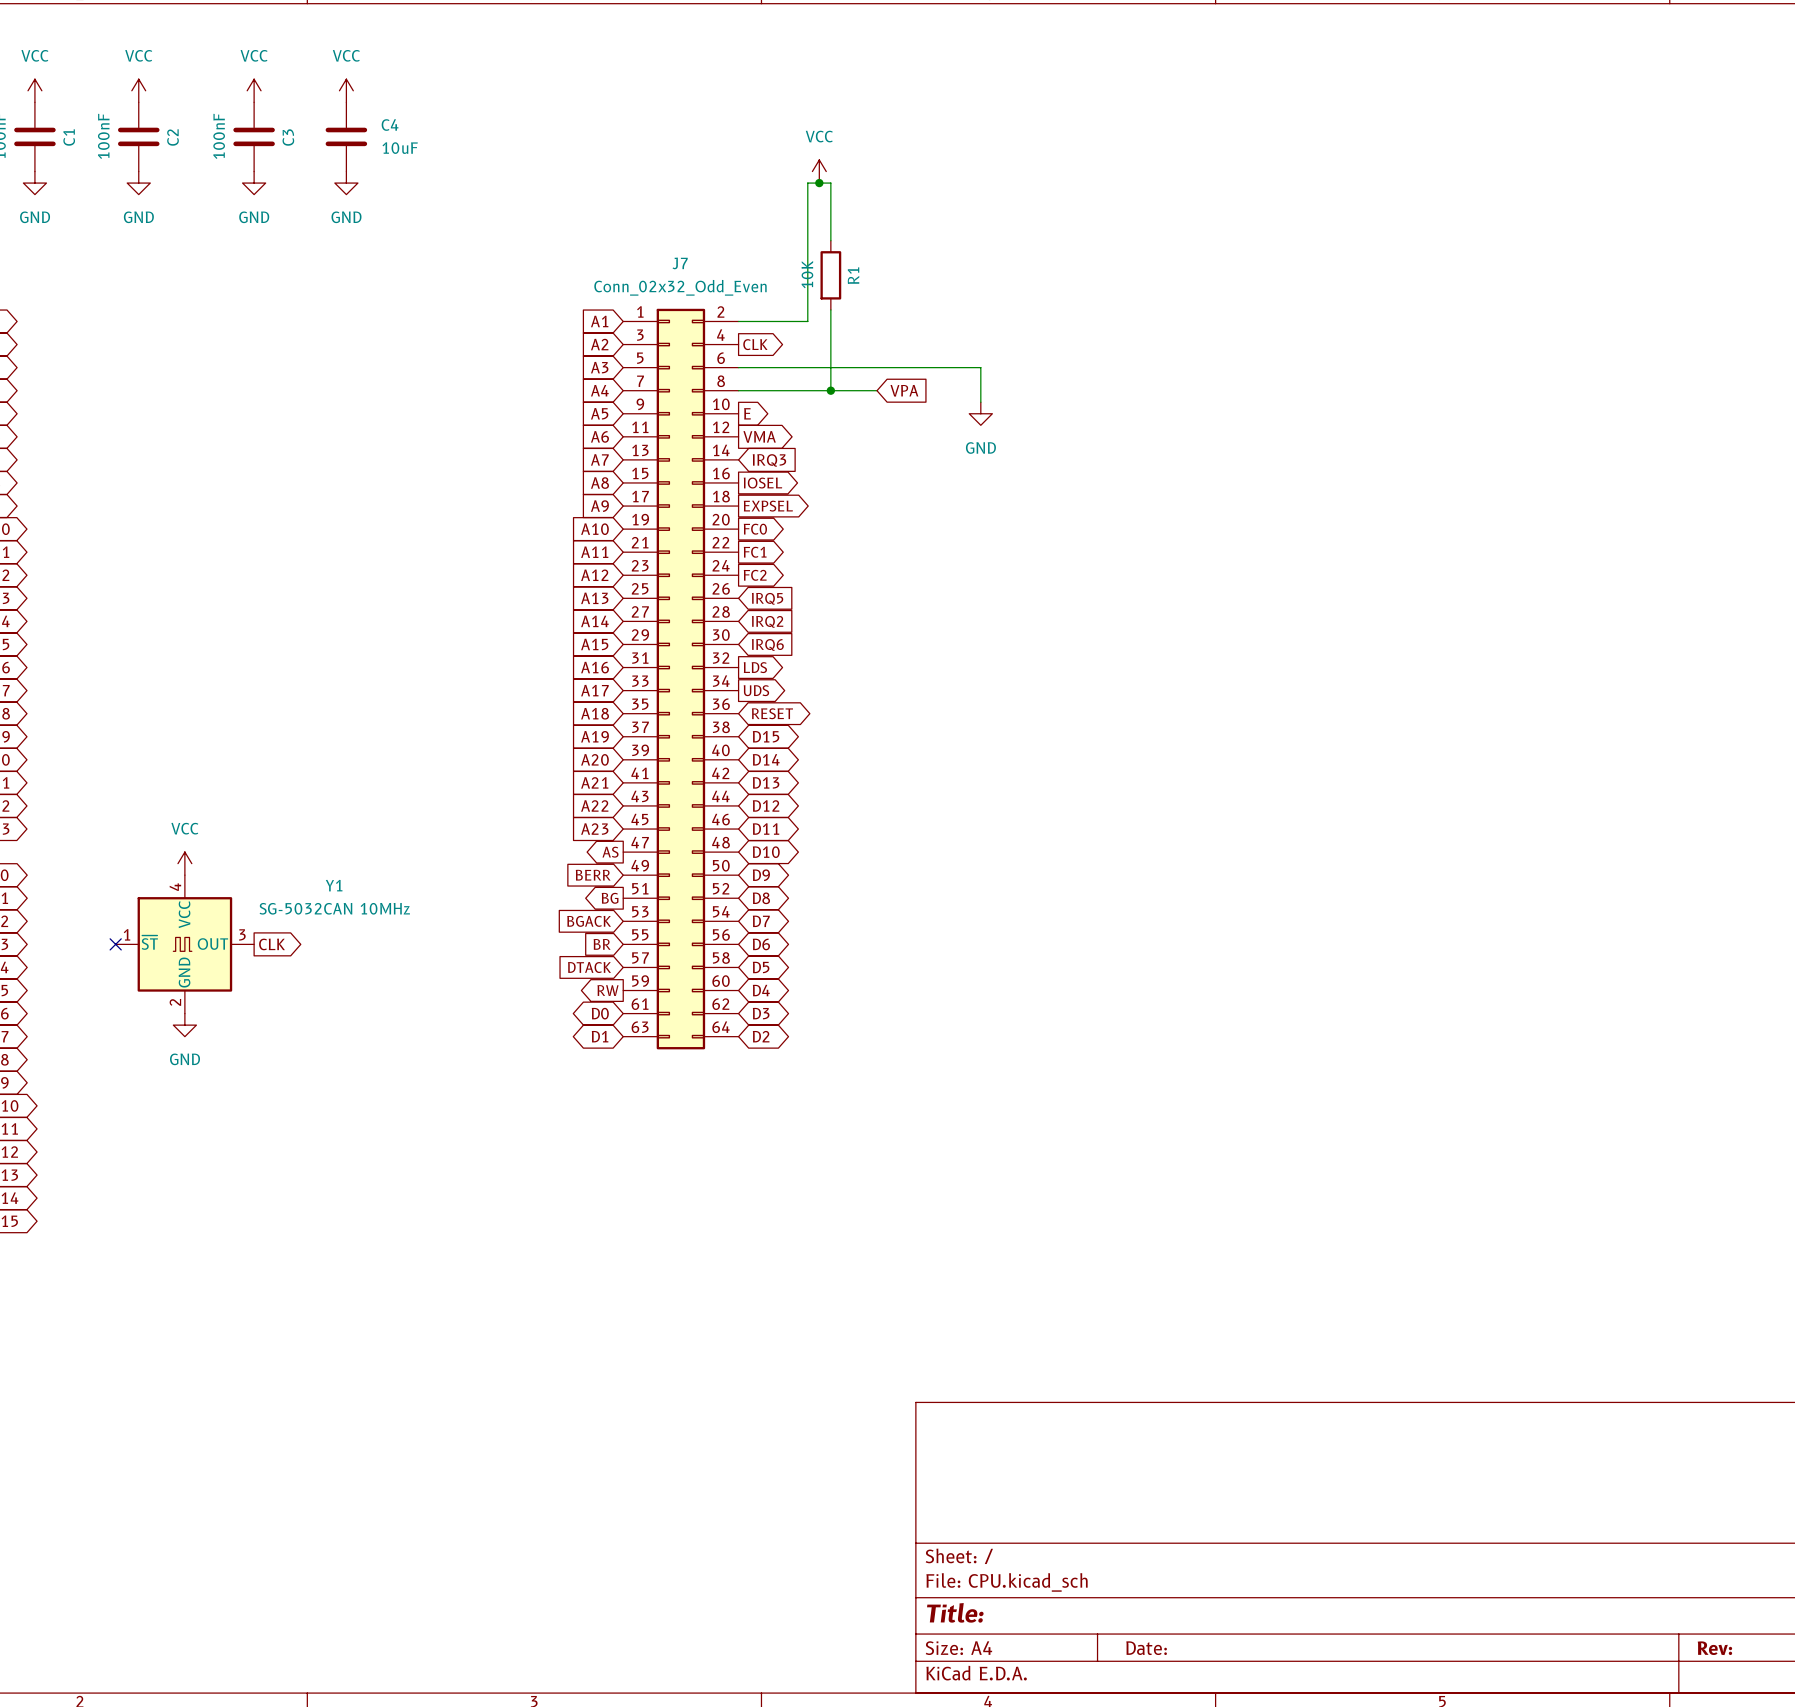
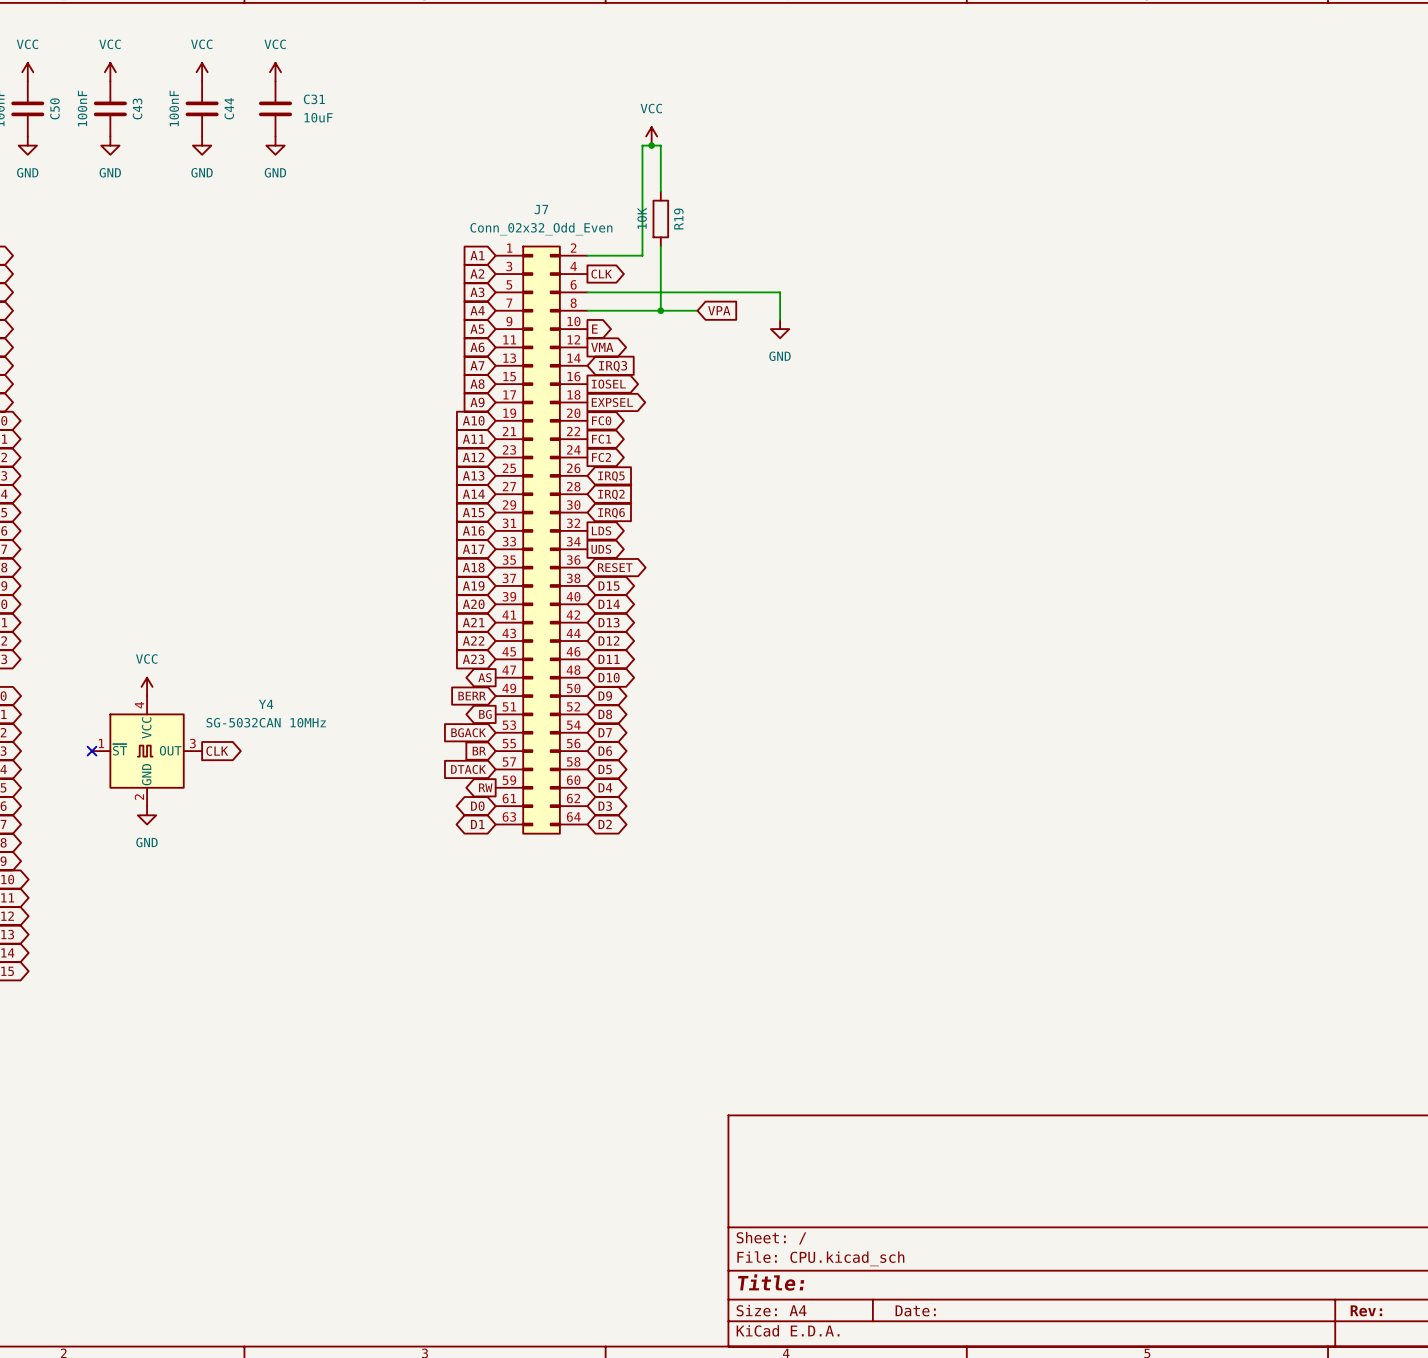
C4 name: C4 (390, 125) -> C31 (314, 99)
C1 name: C1 (69, 137) -> C50 (54, 108)
C2 name: C2 (173, 137) -> C43 (137, 108)
C3 name: C3 (288, 137) -> C44 (229, 108)
R1 name: R1 (853, 275) -> R19 (678, 218)
Y1 name: Y1 (334, 885) -> Y4 (266, 704)

